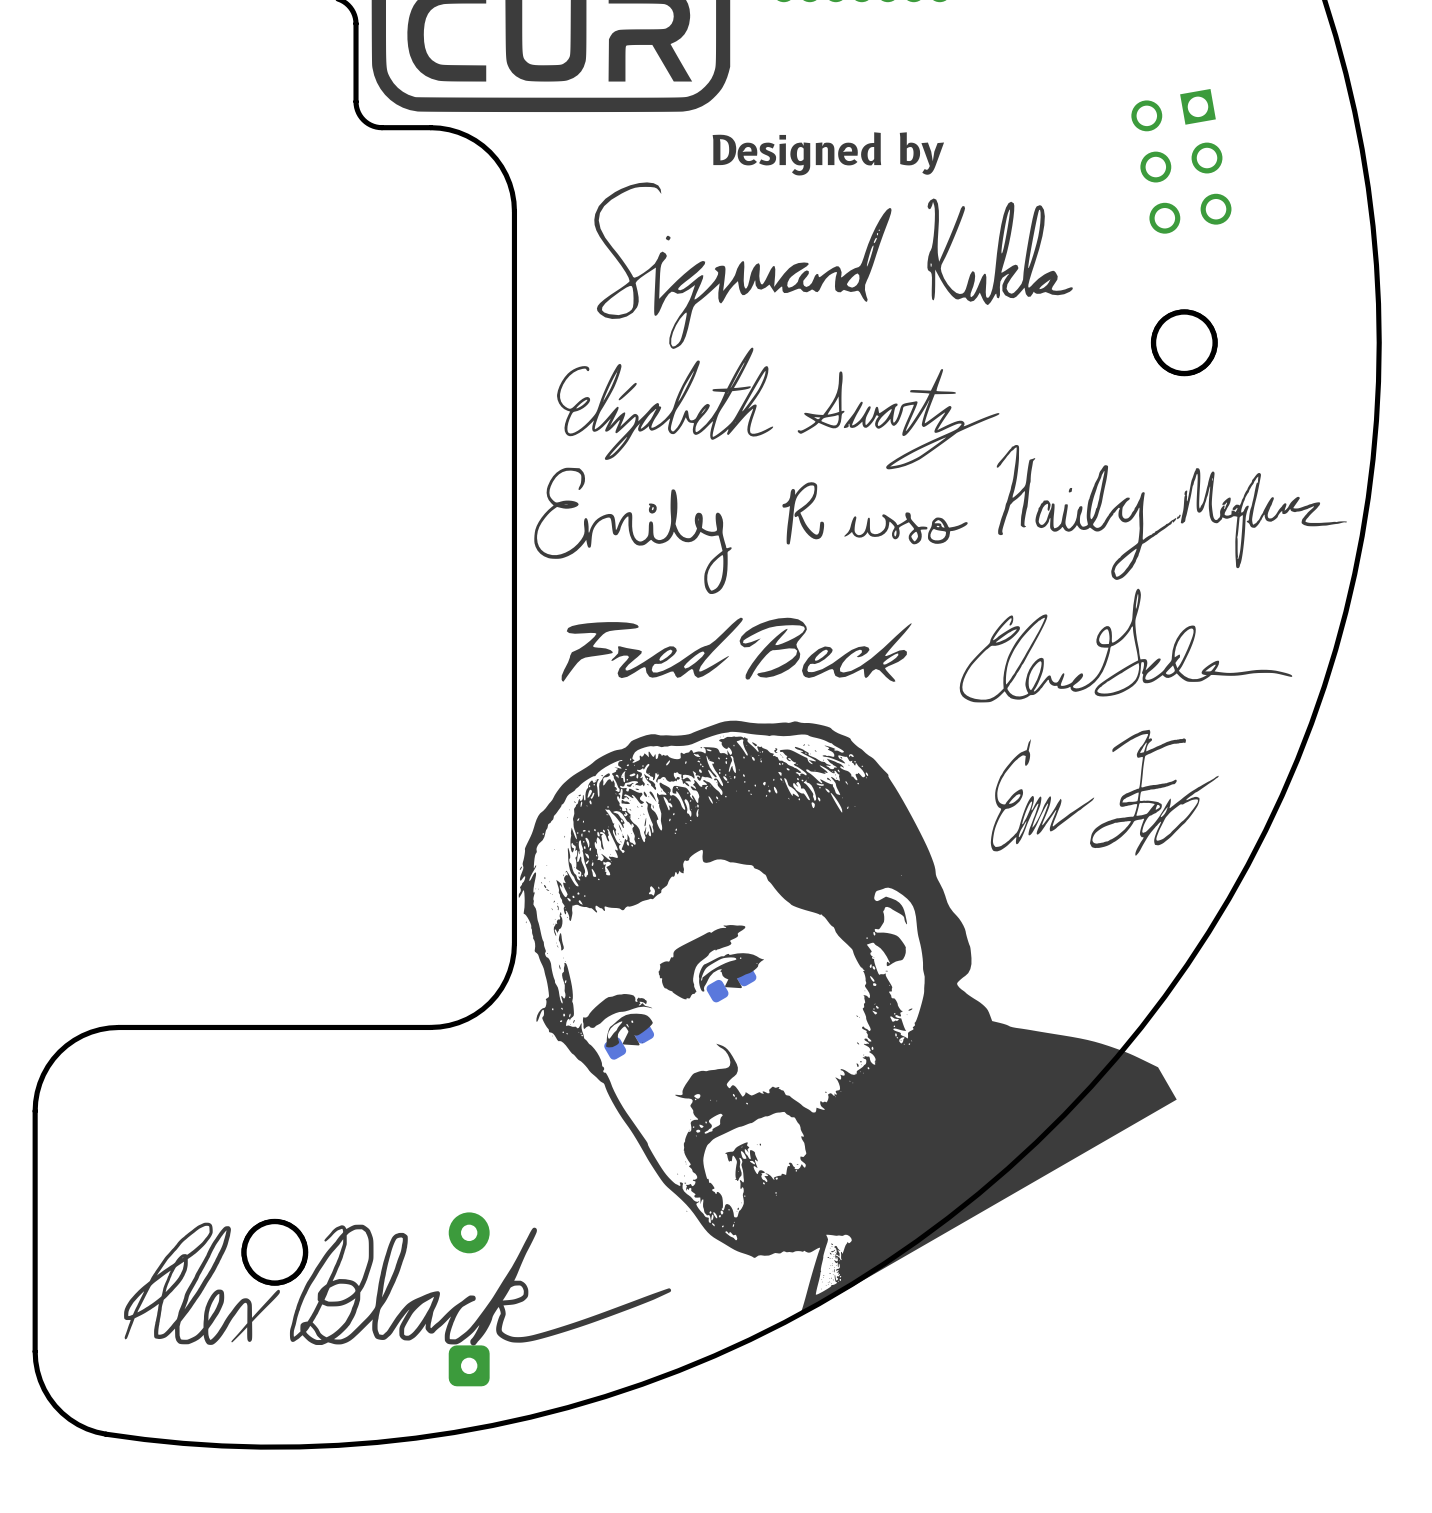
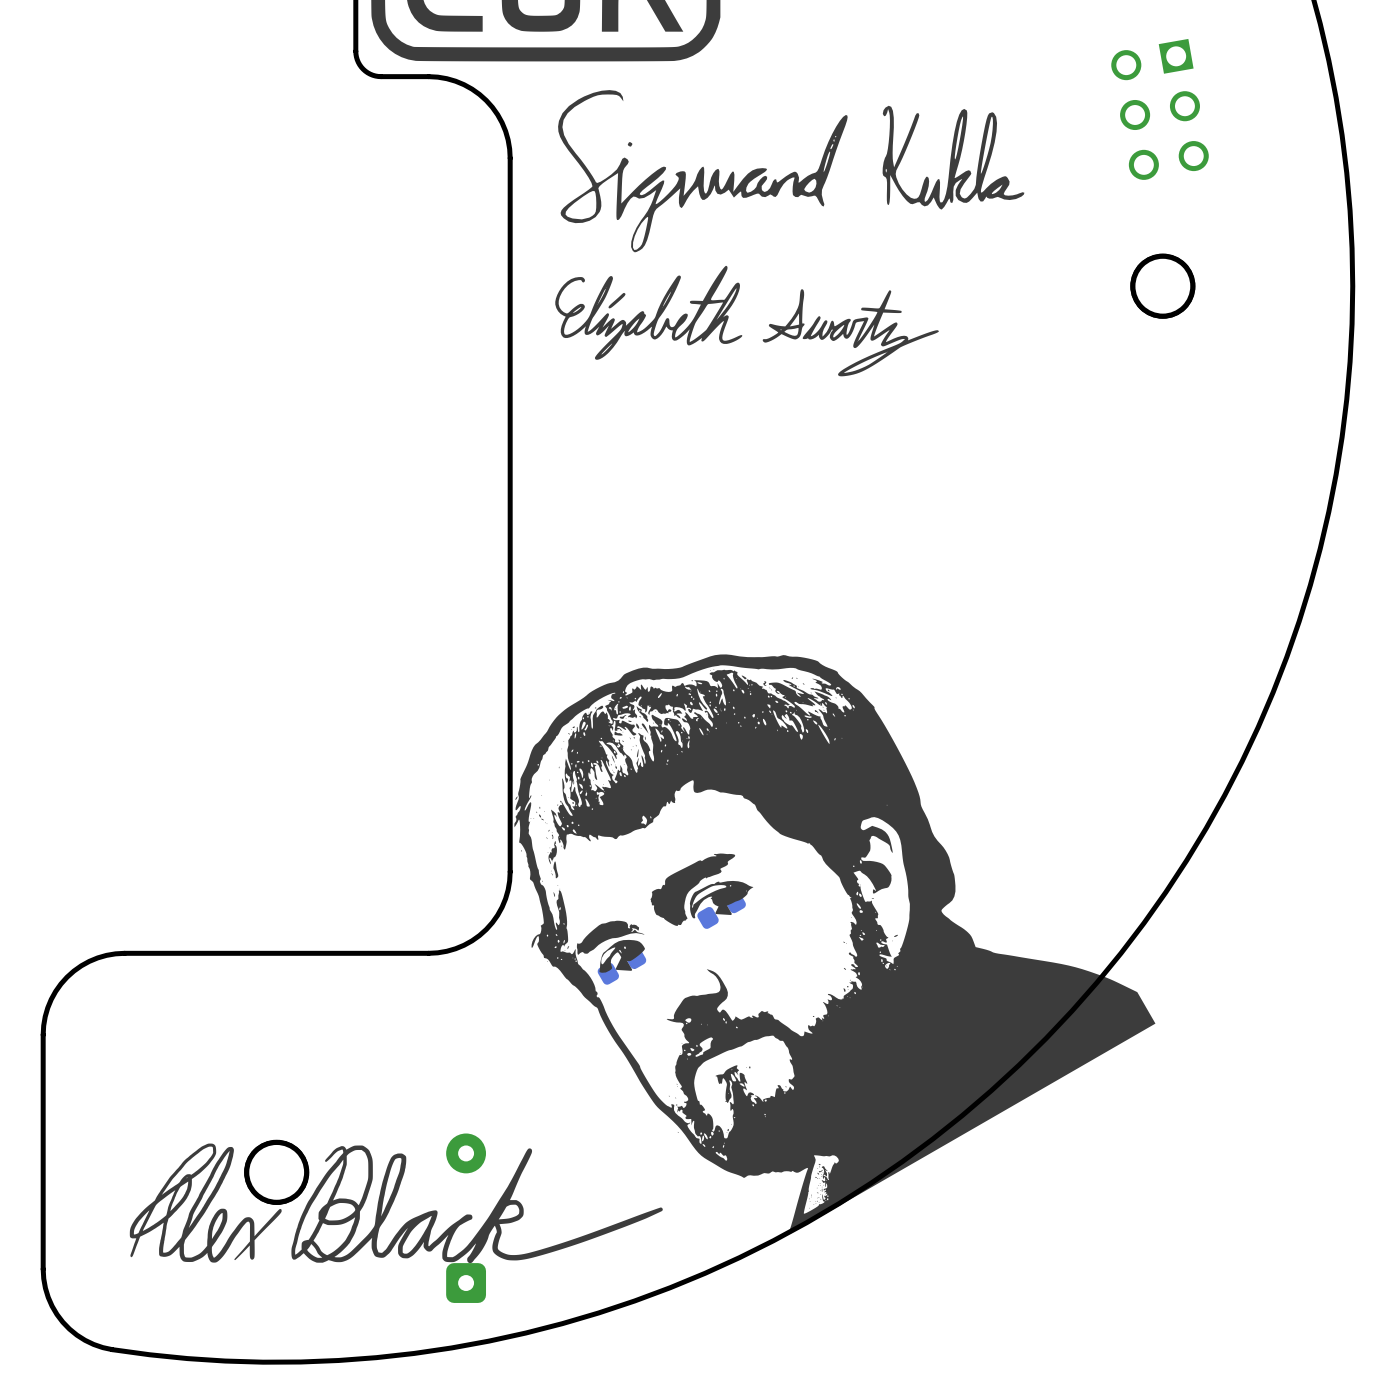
text: Designed by (828, 153) -> none
drawing position: (833, 265) -> (791, 171)
drawing: none -> [555, 265, 939, 377]
drawing: [534, 347, 1347, 703] -> none
drawing: [990, 729, 1219, 856] -> none

